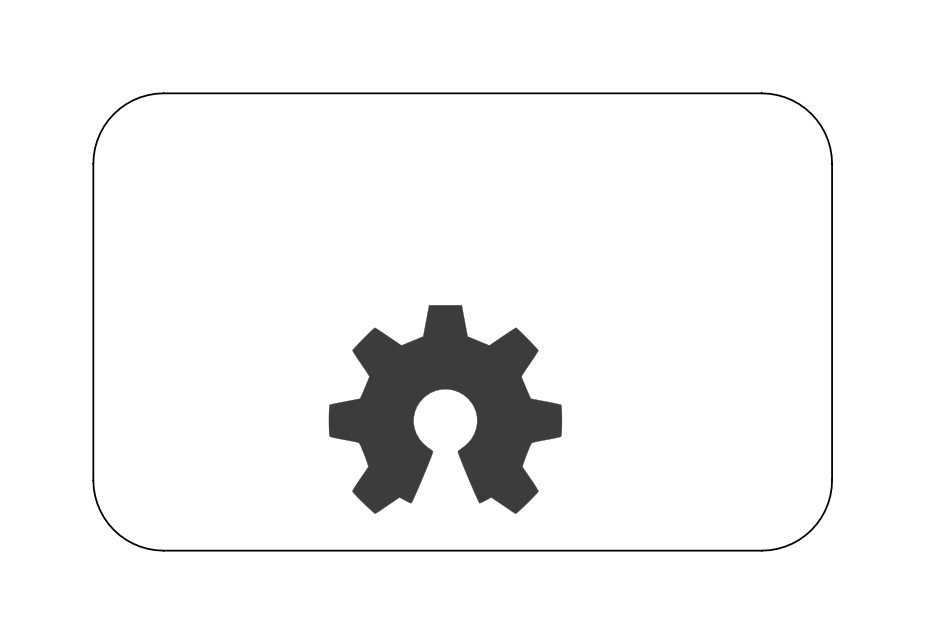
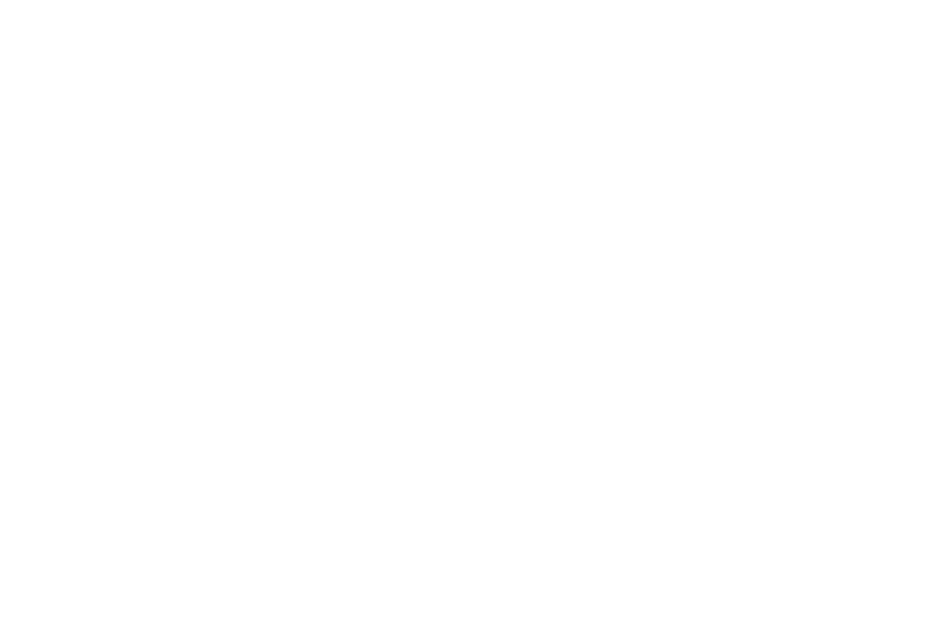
board edge: (163, 93) (761, 93) (777, 95) (799, 104) (811, 113) (821, 126) (828, 140) (832, 163) (832, 480) (828, 503) (821, 517) (811, 530) (792, 543) (777, 548) (761, 550) (163, 550) (140, 546) (126, 539) (113, 530) (104, 517) (97, 503) (93, 488) (93, 155) (100, 133) (113, 113) (133, 100) (148, 95) (163, 93) -> none
drawing: [328, 305, 563, 514] -> none

